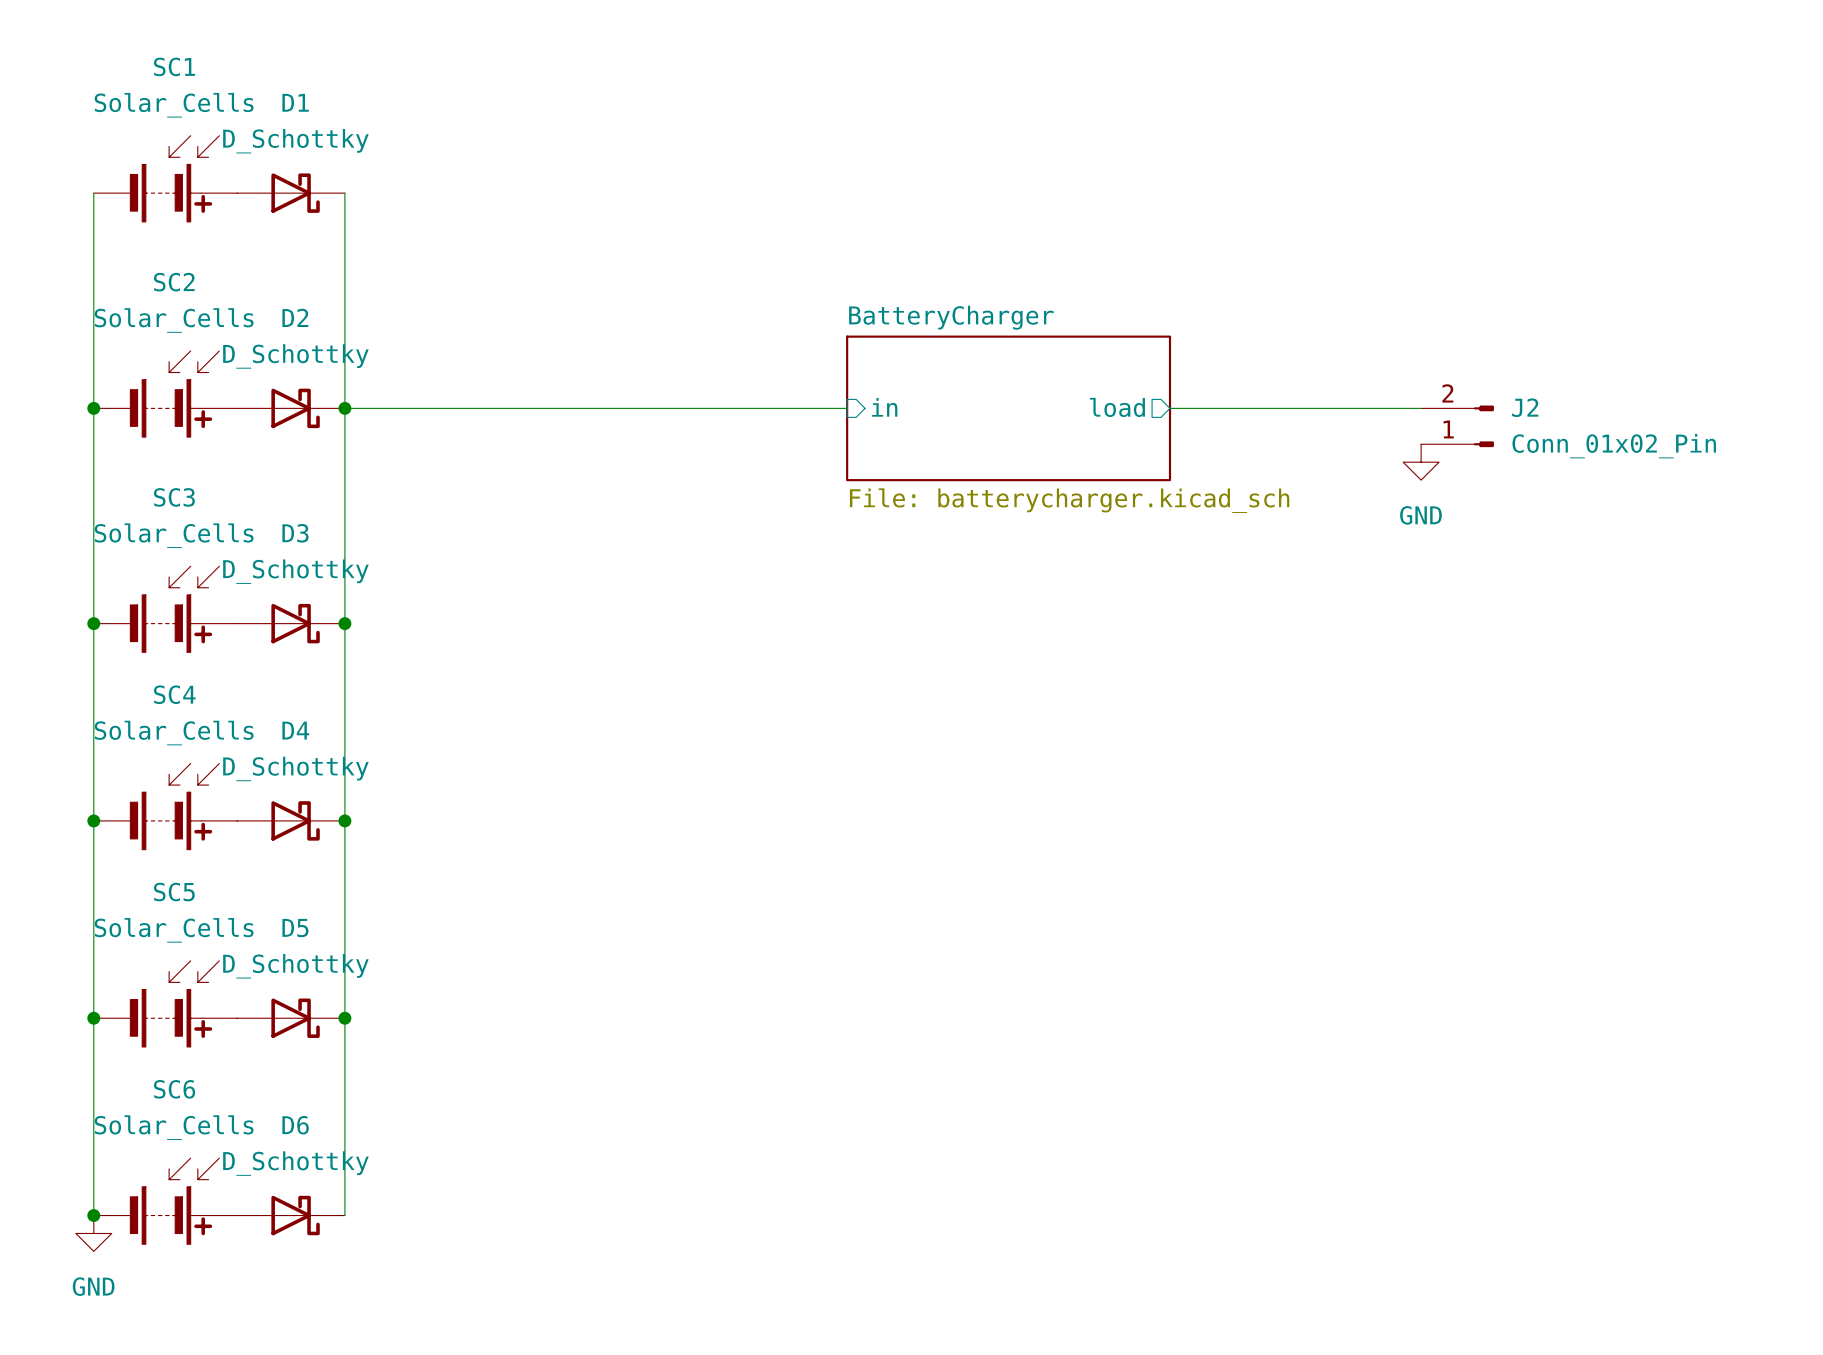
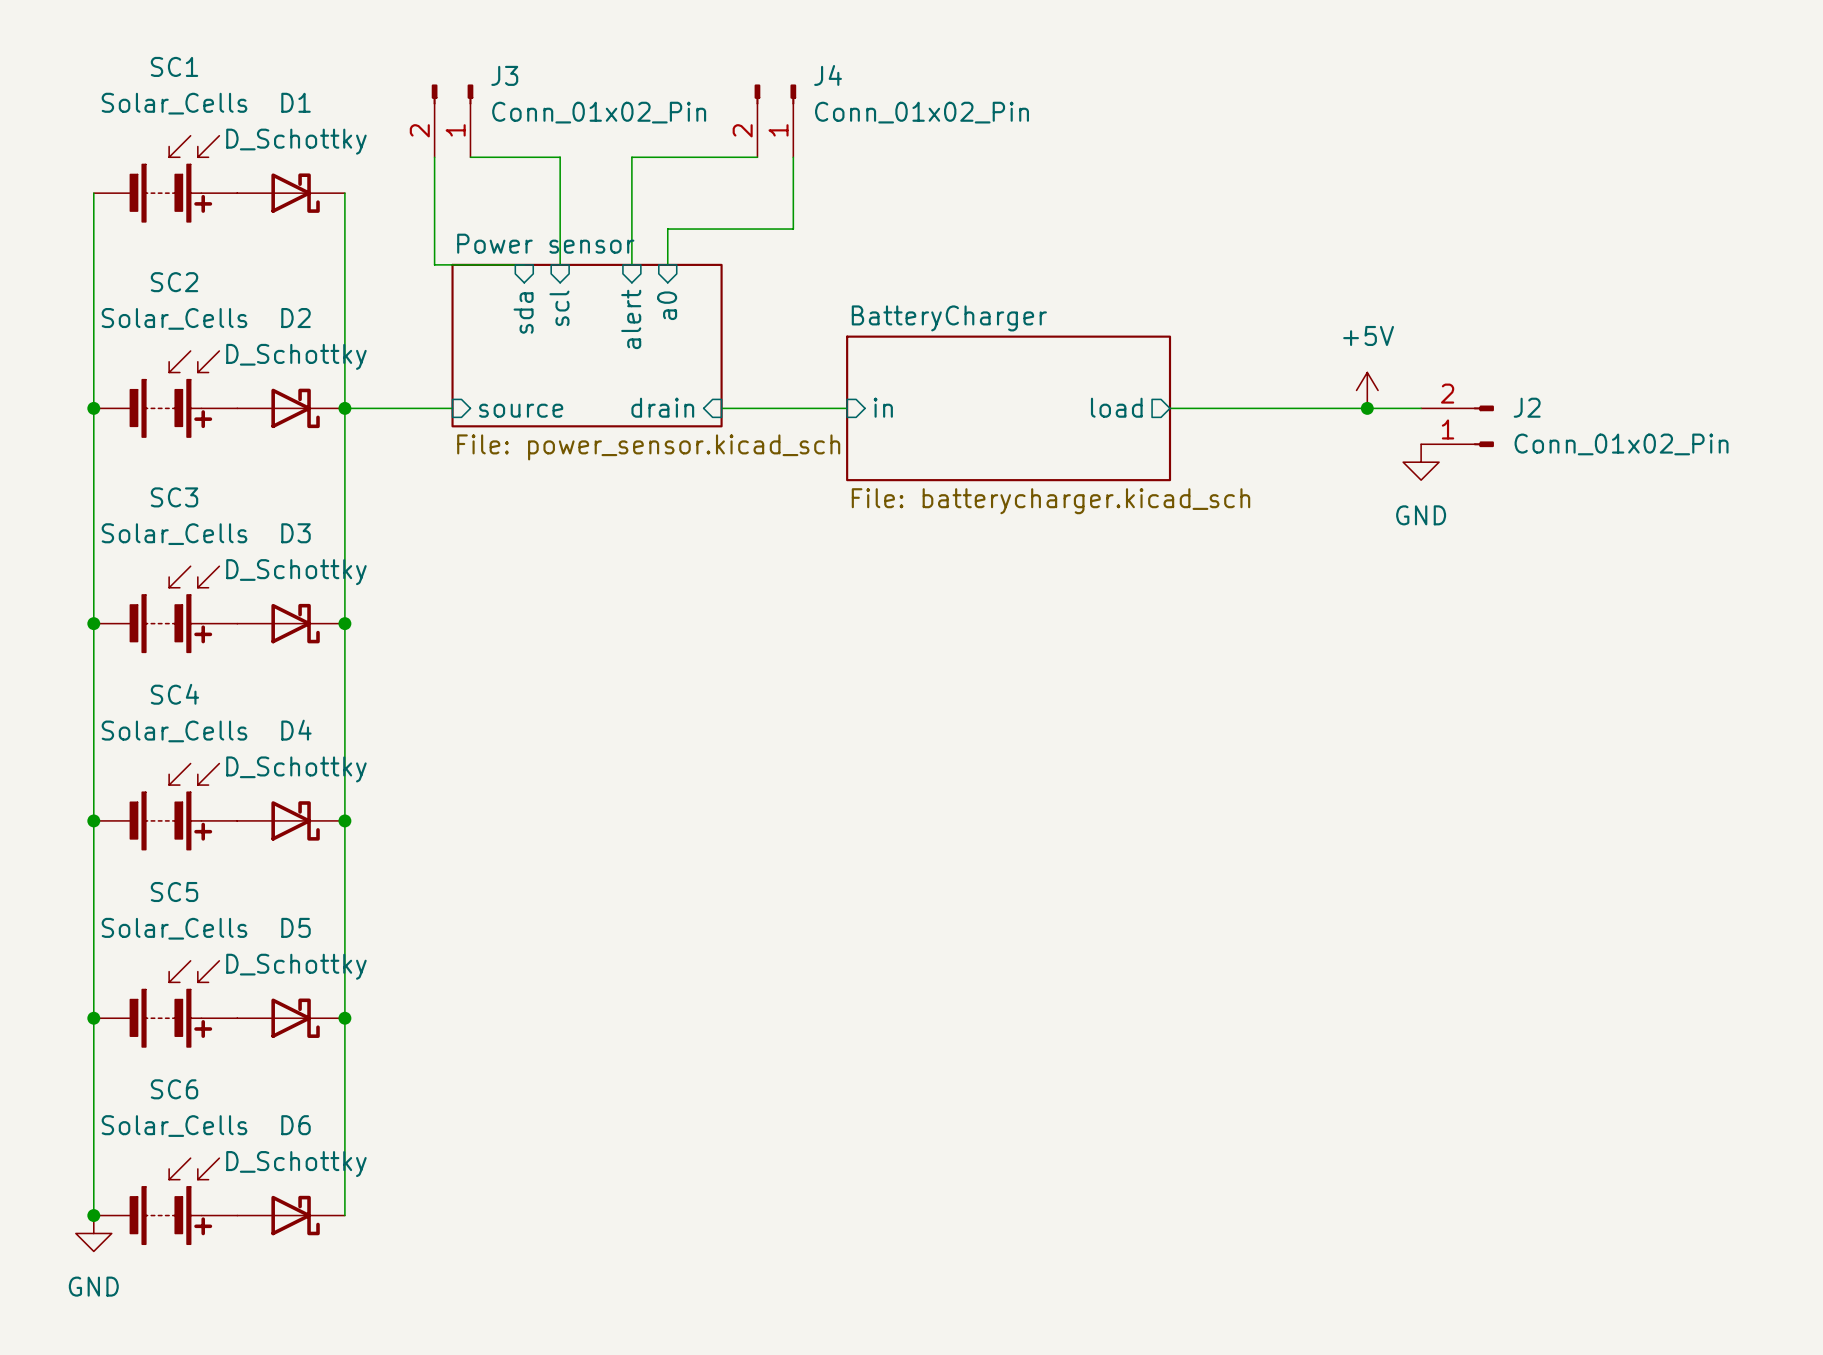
J3: none -> Conn_01x02_Pin (452, 120)
J4: none -> Conn_01x02_Pin (775, 120)
wire: none -> (434, 157) (434, 264) (524, 264)
wire: none -> (470, 157) (560, 157) (560, 264)
wire: none -> (757, 157) (631, 157) (631, 264)
wire: none -> (793, 157) (793, 229) (667, 229) (667, 264)
sheet pin: none -> a0 (667, 305)
sheet pin: none -> sda (523, 313)
sheet pin: none -> scl (559, 308)
sheet pin: none -> alert (631, 319)
sheet Power sensor: none -> File: power_sensor.kicad_sch (587, 345)
power symbol: none -> +5V (1367, 390)
sheet pin: none -> drain (662, 407)
wire: (452, 408) (721, 408) -> none
junction: none -> (1367, 408)
sheet pin: none -> source (521, 410)

